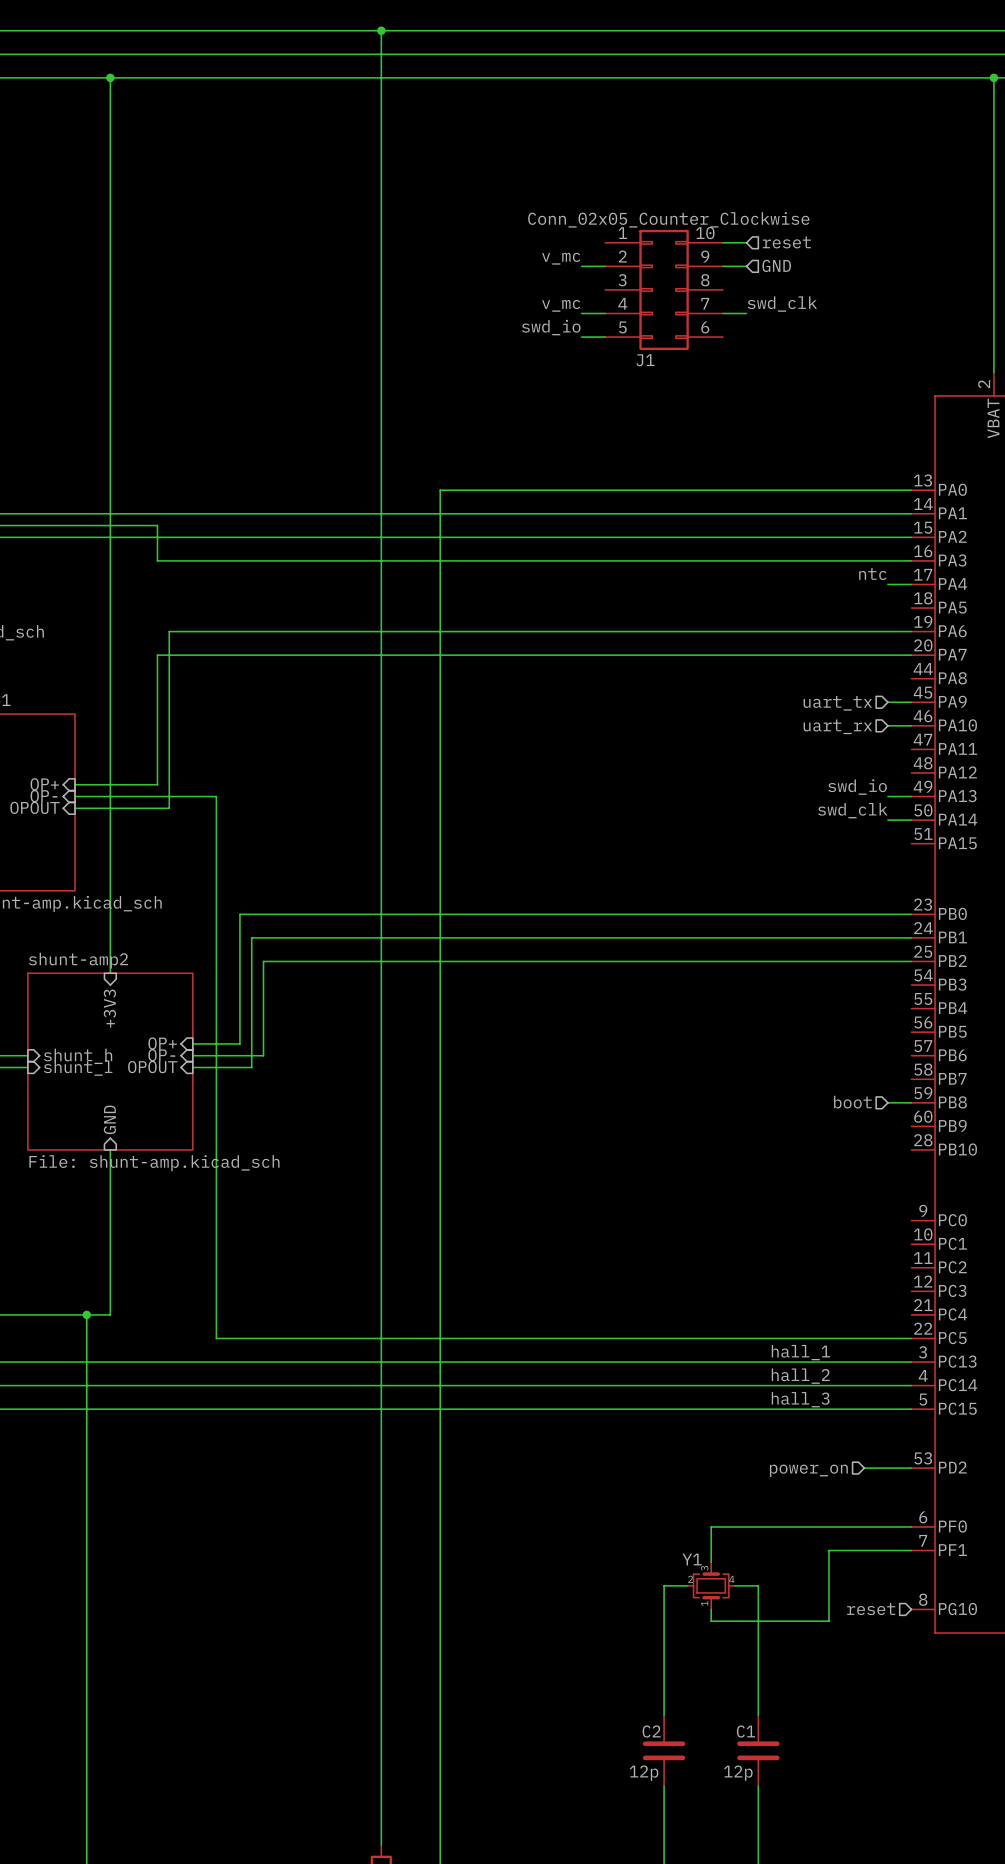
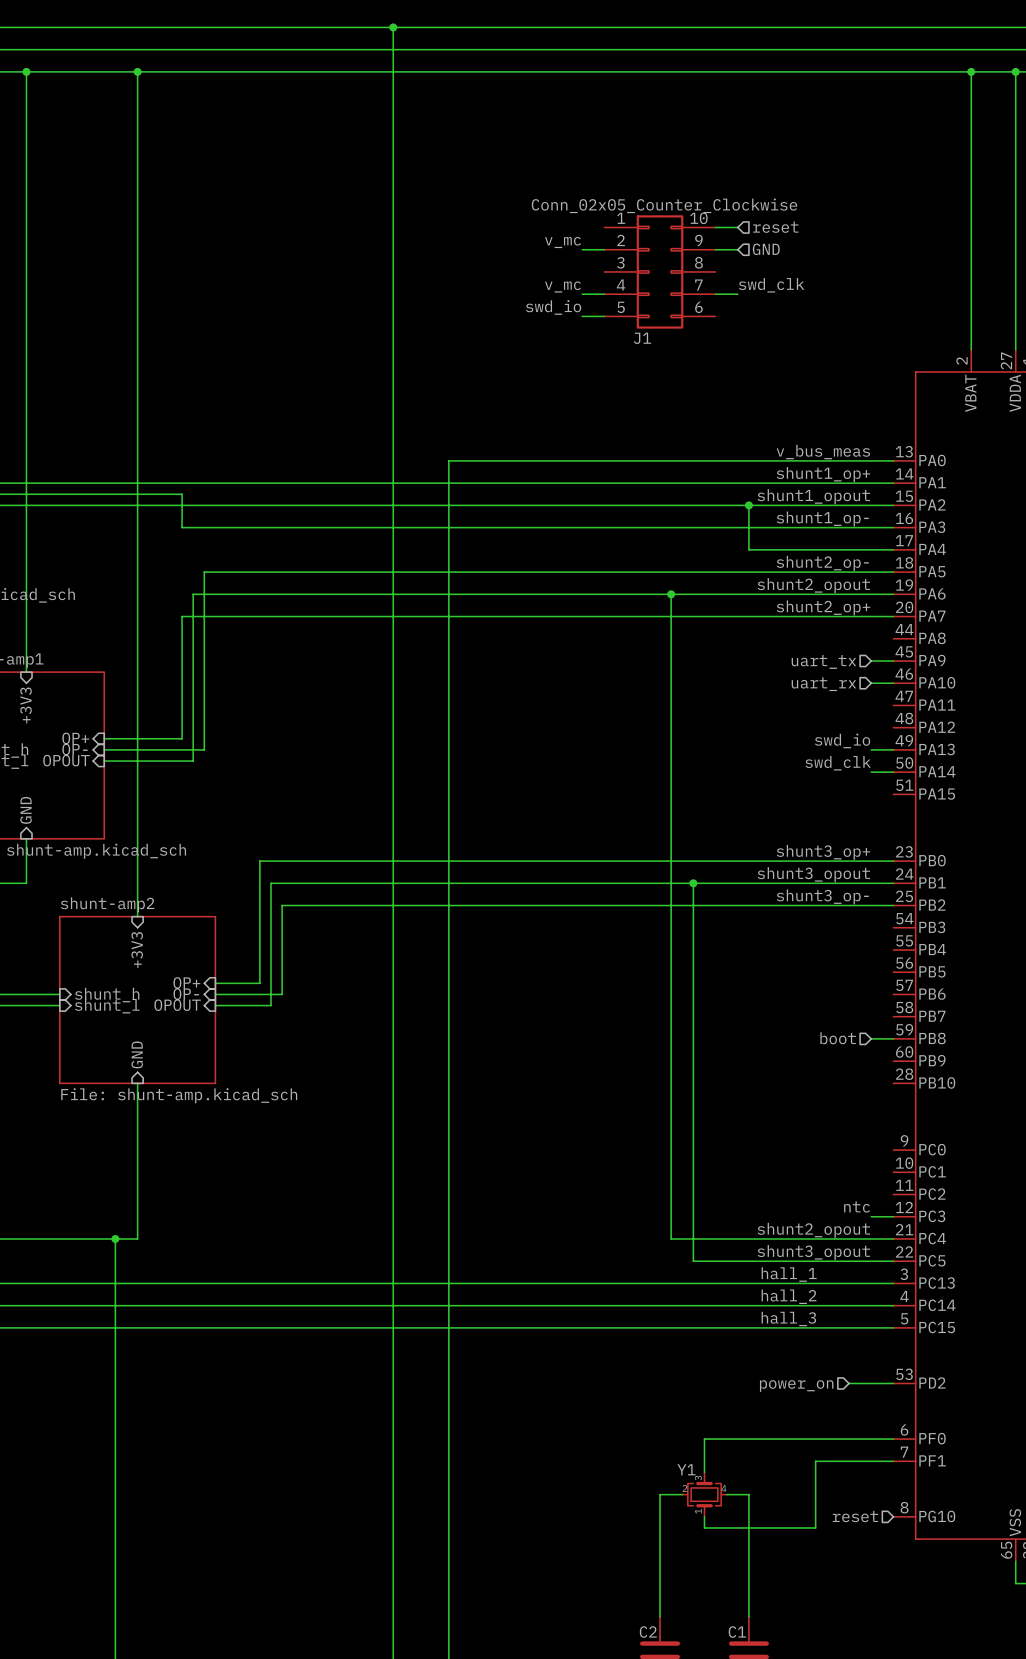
label: none -> v_bus_meas (823, 452)
label: none -> shunt1_op+ (823, 474)
label: none -> shunt1_opout (813, 496)
wire: none -> (748, 505) (748, 549) (871, 549)
junction: none -> (748, 505)
label: none -> shunt1_op- (822, 518)
label: ntc (872, 574) -> none
label: none -> shunt2_op- (822, 563)
wire: none -> (893, 572) (204, 572) (204, 749)
label: none -> shunt2_opout (813, 585)
wire: none -> (671, 594) (671, 1238) (893, 1238)
junction: none -> (671, 594)
label: none -> shunt2_op+ (823, 607)
wire: (181, 796) (216, 796) (216, 1338) (699, 1338) -> (693, 883) (693, 1261)
label: none -> shunt3_op+ (823, 852)
label: none -> shunt3_opout (813, 874)
junction: none -> (693, 883)
label: none -> shunt3_op- (822, 896)
label: none -> ntc (856, 1206)
wire: none -> (871, 1216) (893, 1216)
label: none -> shunt2_opout (813, 1230)
label: none -> shunt3_opout (813, 1252)

